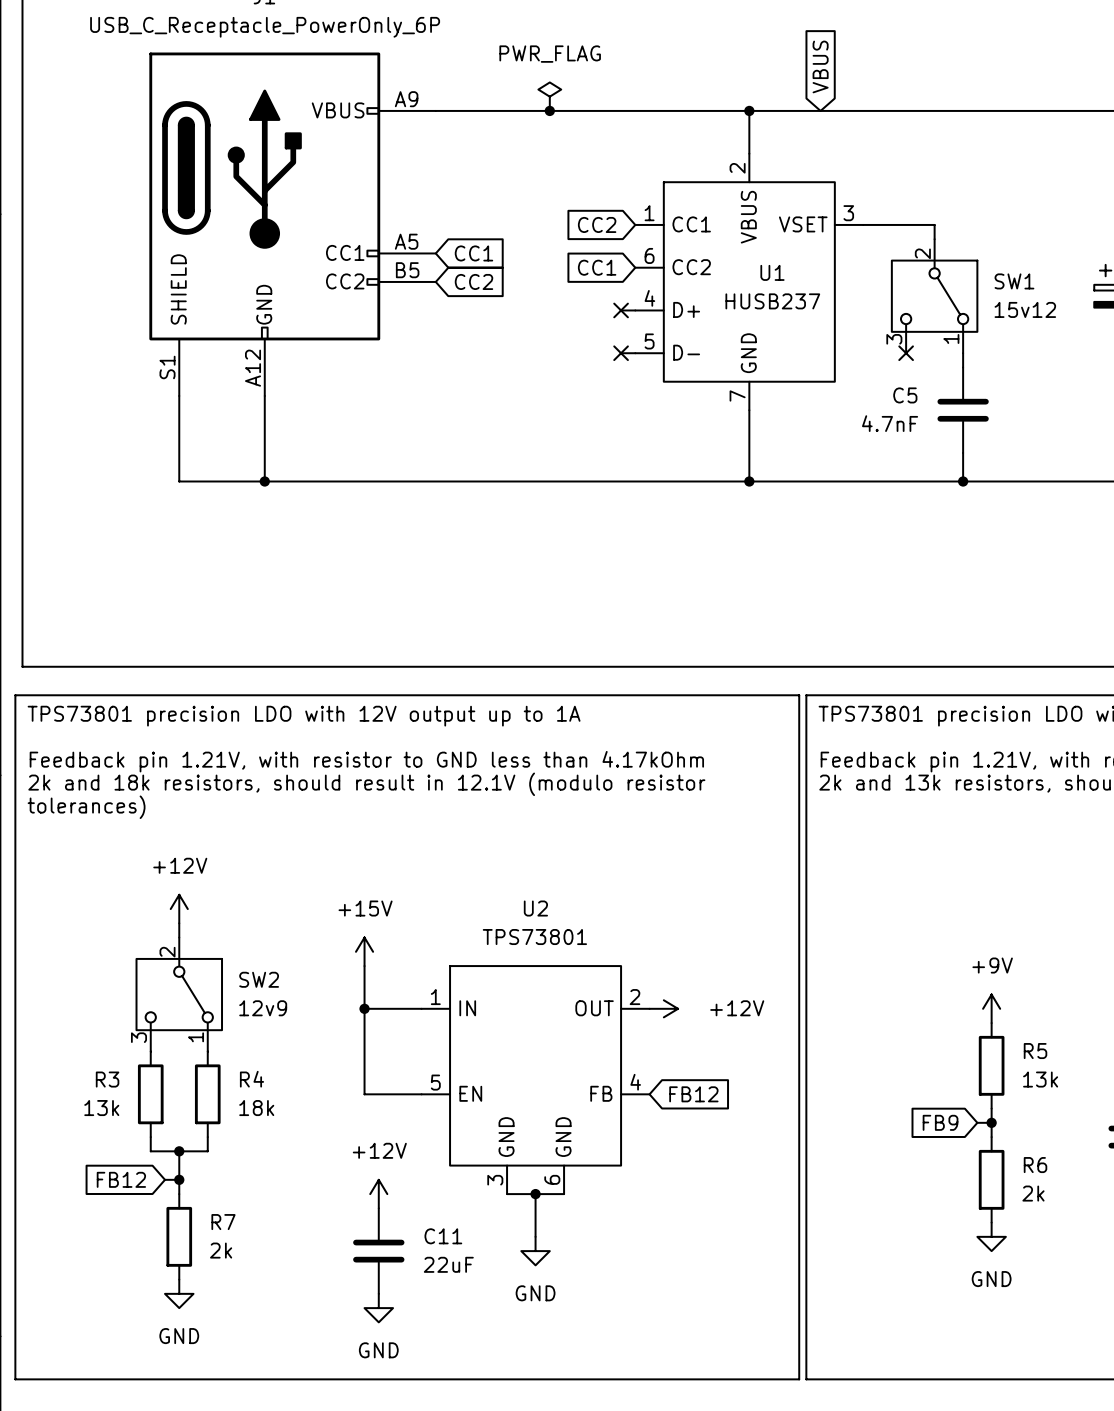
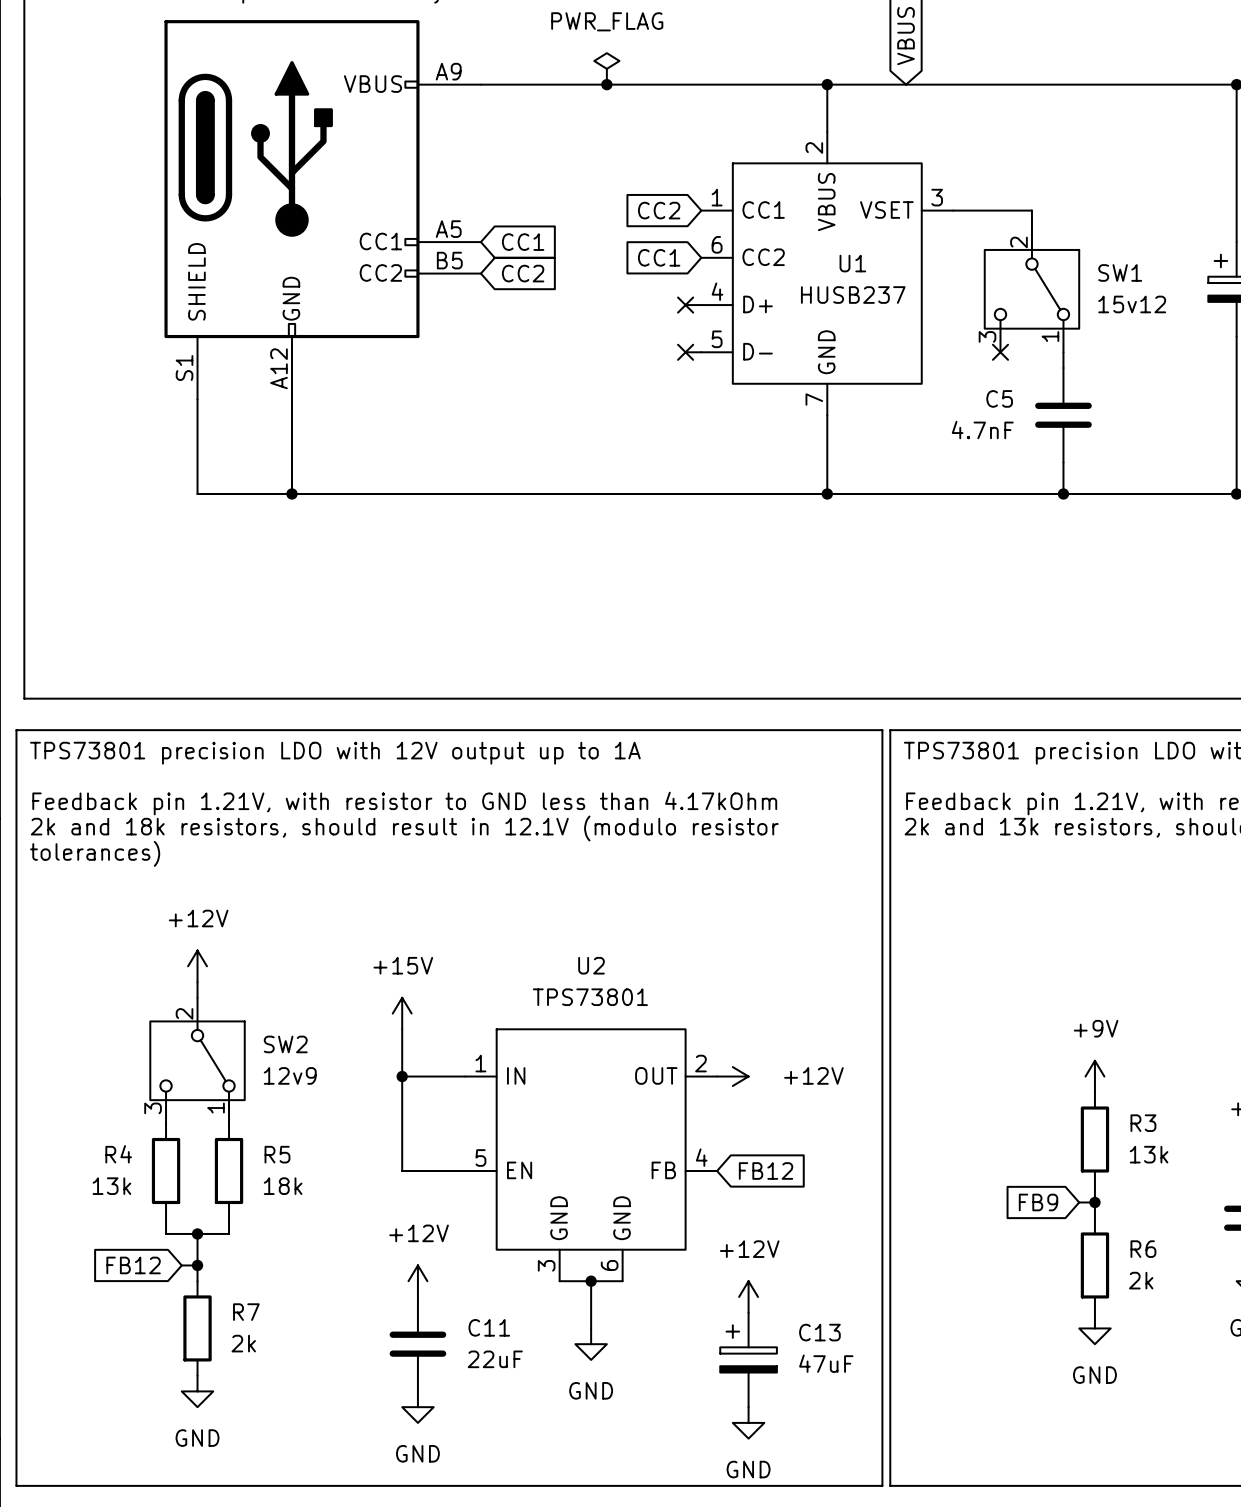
R5 name: R5 (1035, 1051) -> R3 (1143, 1123)
R3 name: R3 (107, 1079) -> R4 (118, 1154)
R4 name: R4 (251, 1079) -> R5 (277, 1154)
power symbol: none -> +12V (748, 1296)
C13: none -> 47uF (748, 1359)
power symbol: none -> GND (748, 1422)

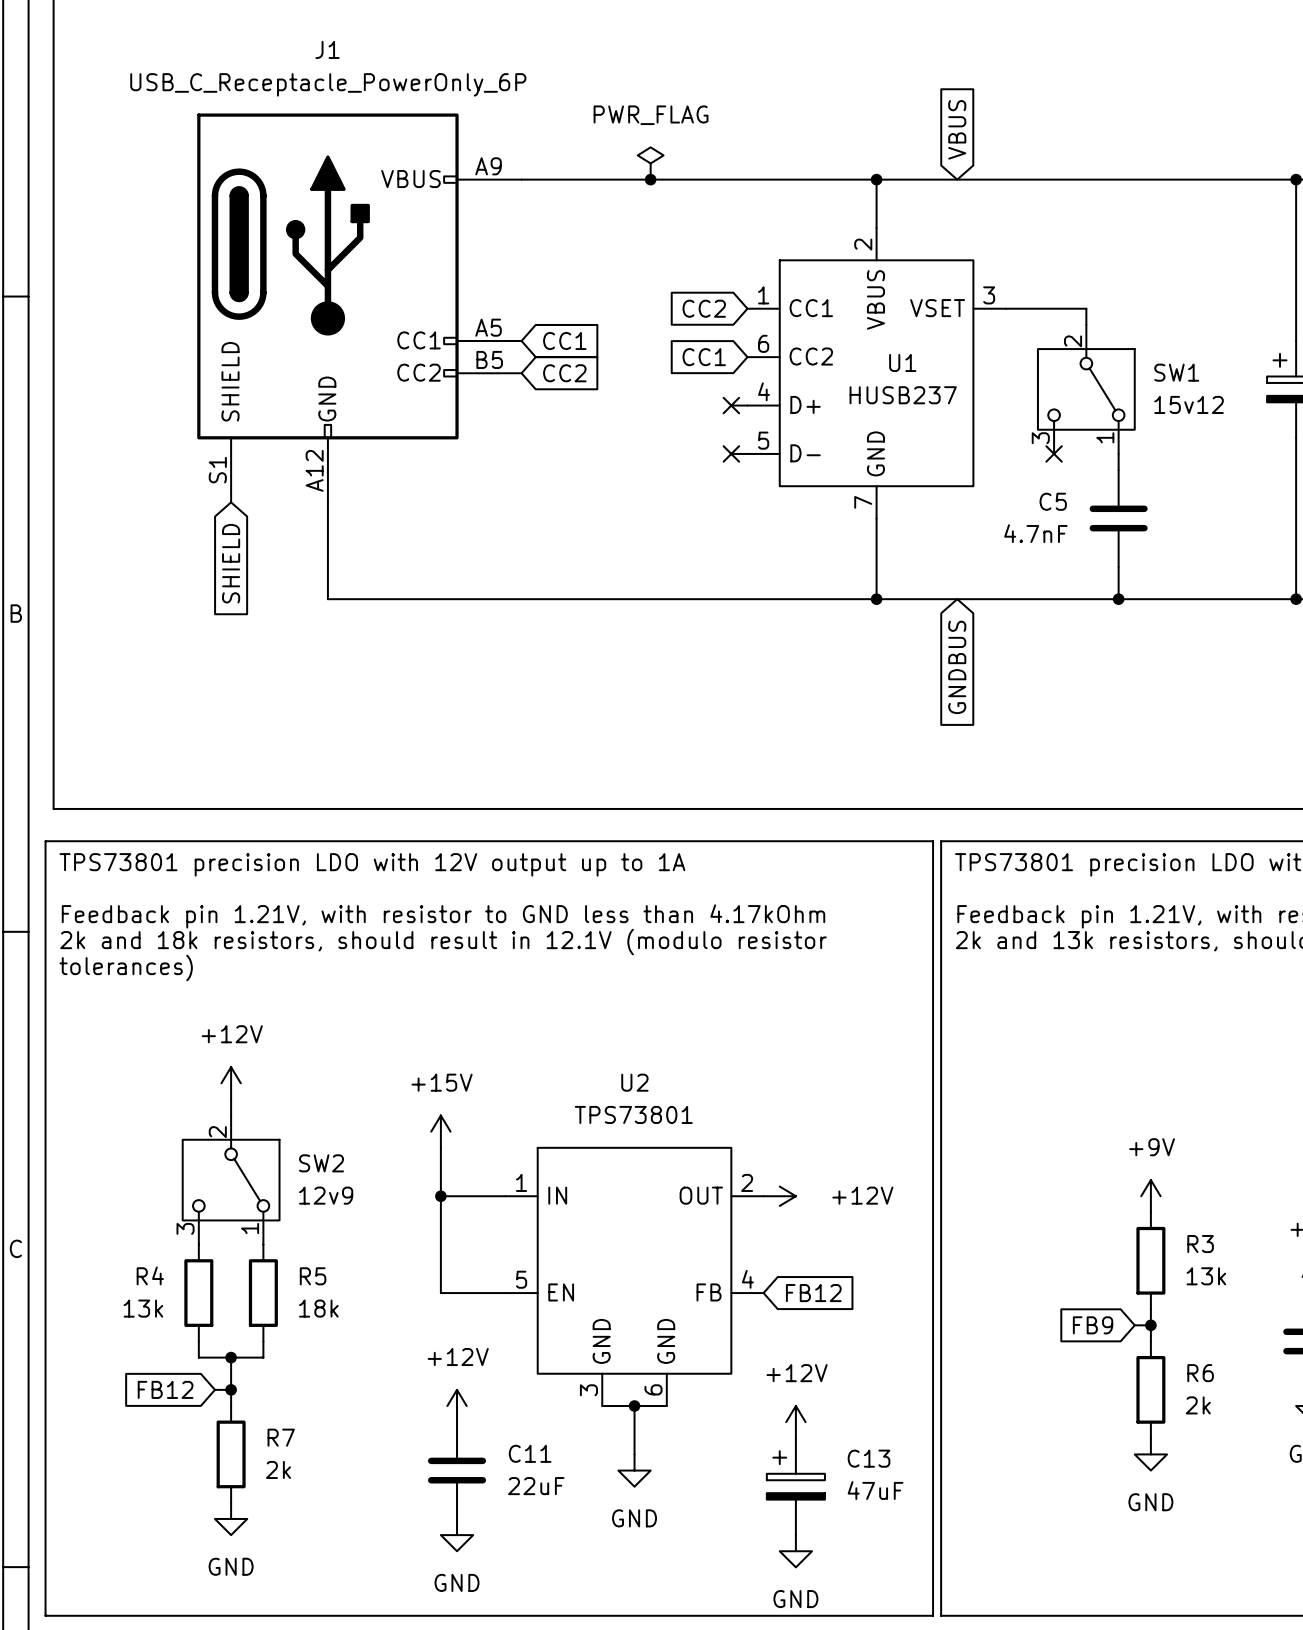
wire: (197, 399) (197, 493) (291, 493) -> none
global label: none -> SHIELD (231, 563)
junction: (291, 493) -> none
global label: none -> GNDBUS (957, 667)

